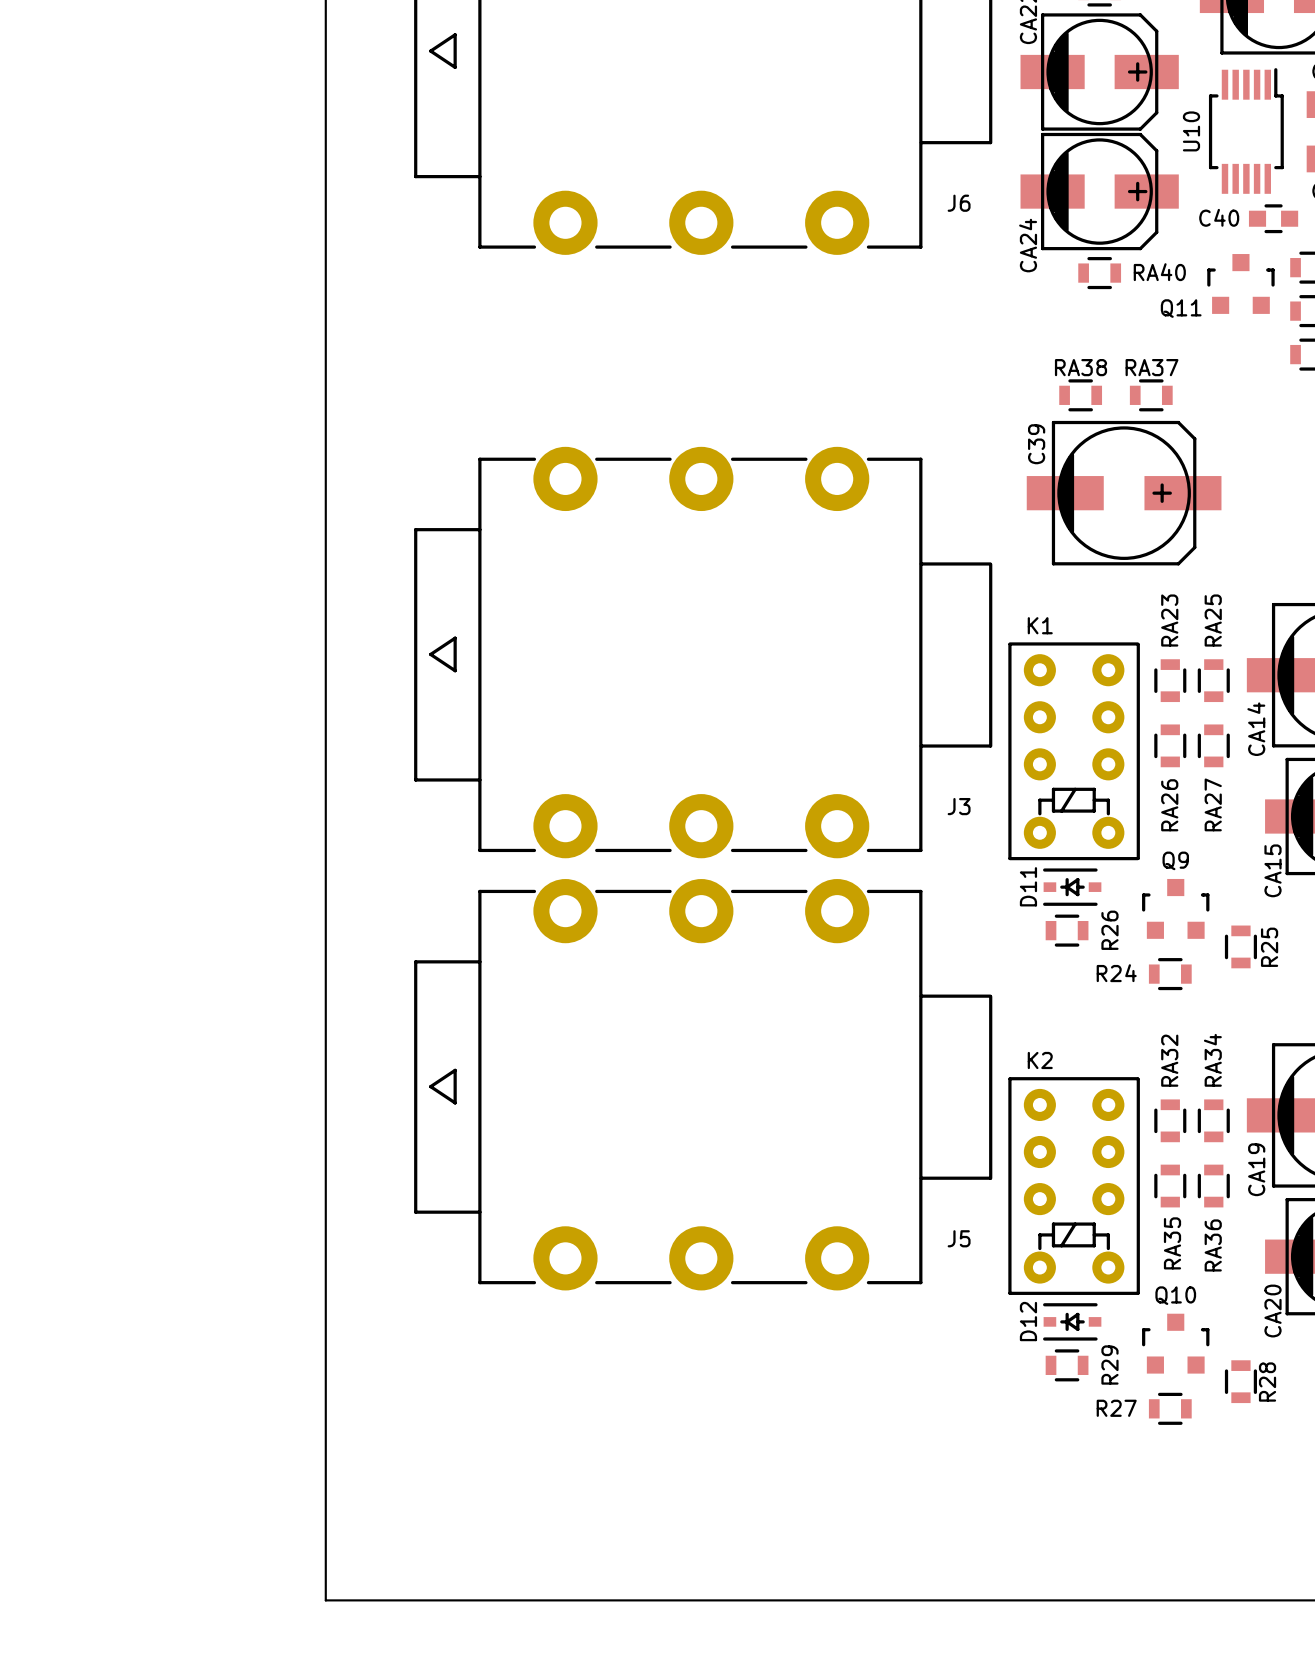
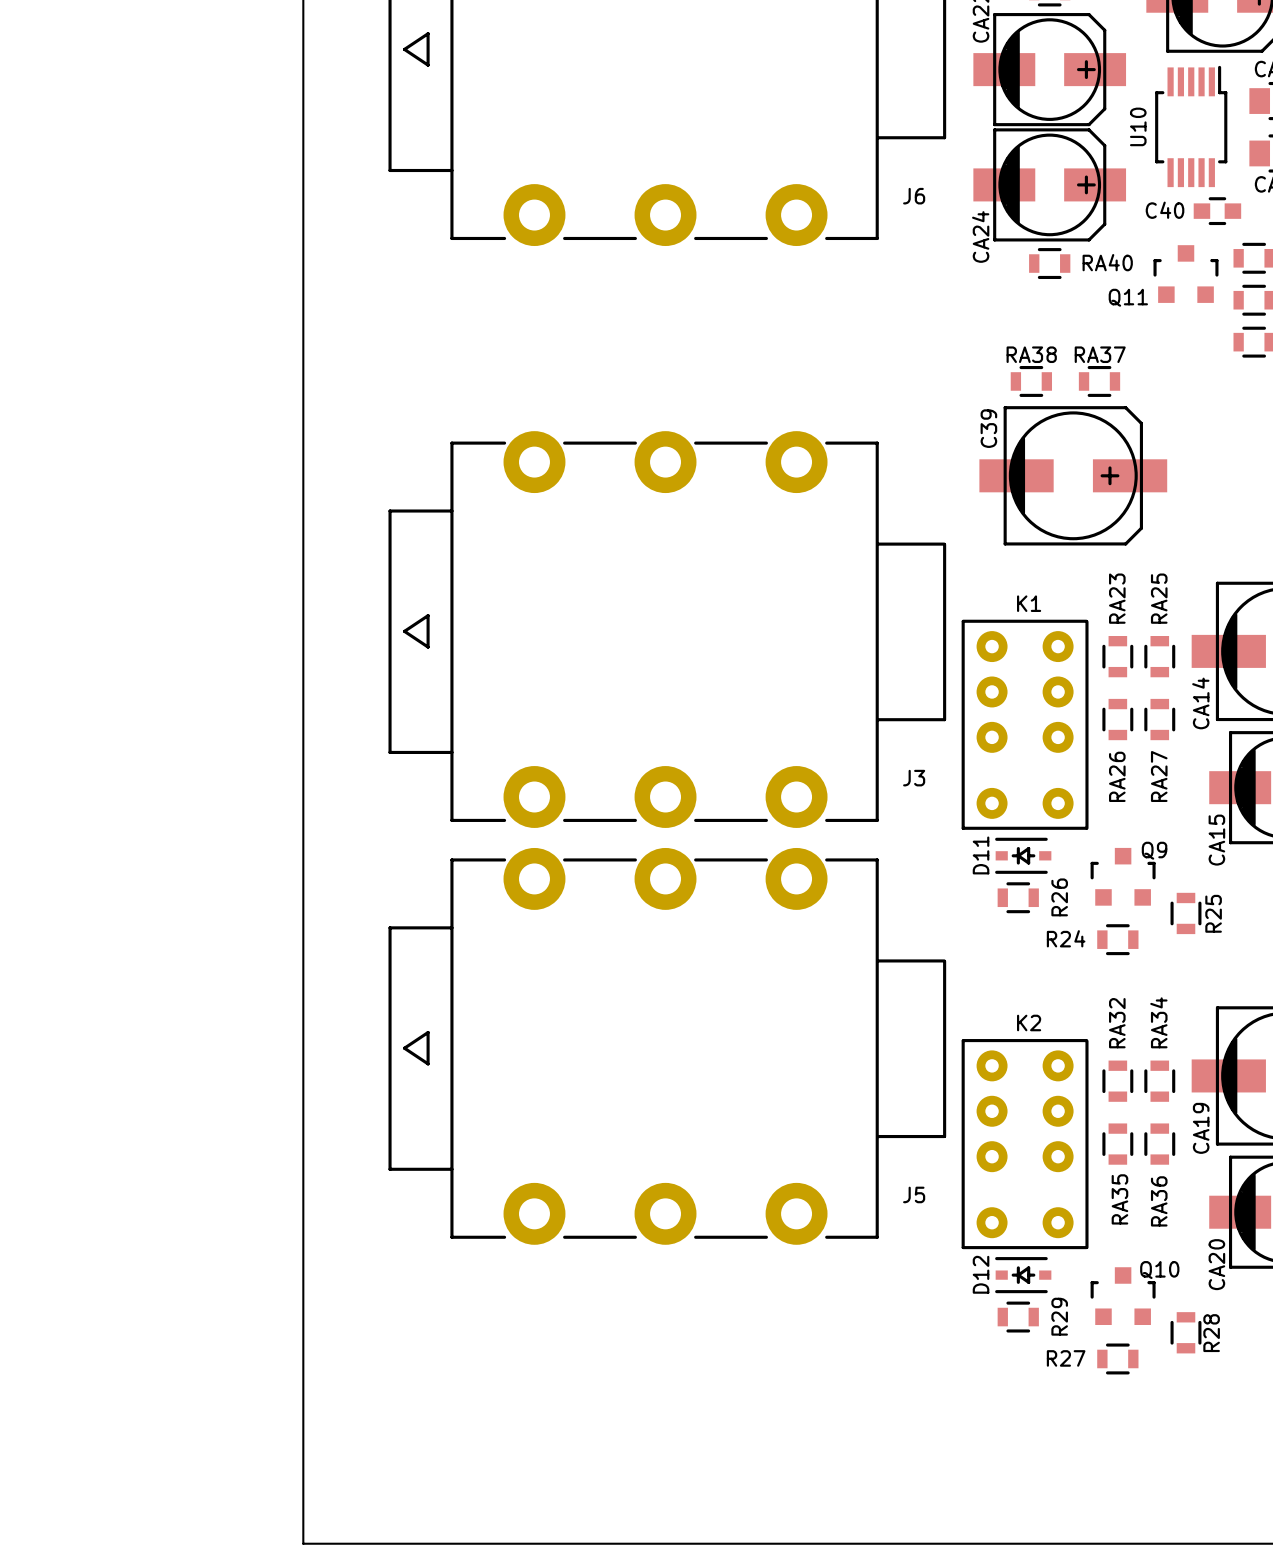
K1 footprint: [1008, 642, 1140, 861] -> [961, 619, 1089, 830]
Q9 name position: Q9 (1175, 860) -> Q9 (1154, 850)
K2 footprint: [1008, 1077, 1140, 1295] -> [961, 1039, 1089, 1250]
Q10 name position: Q10 (1175, 1295) -> Q10 (1159, 1270)

